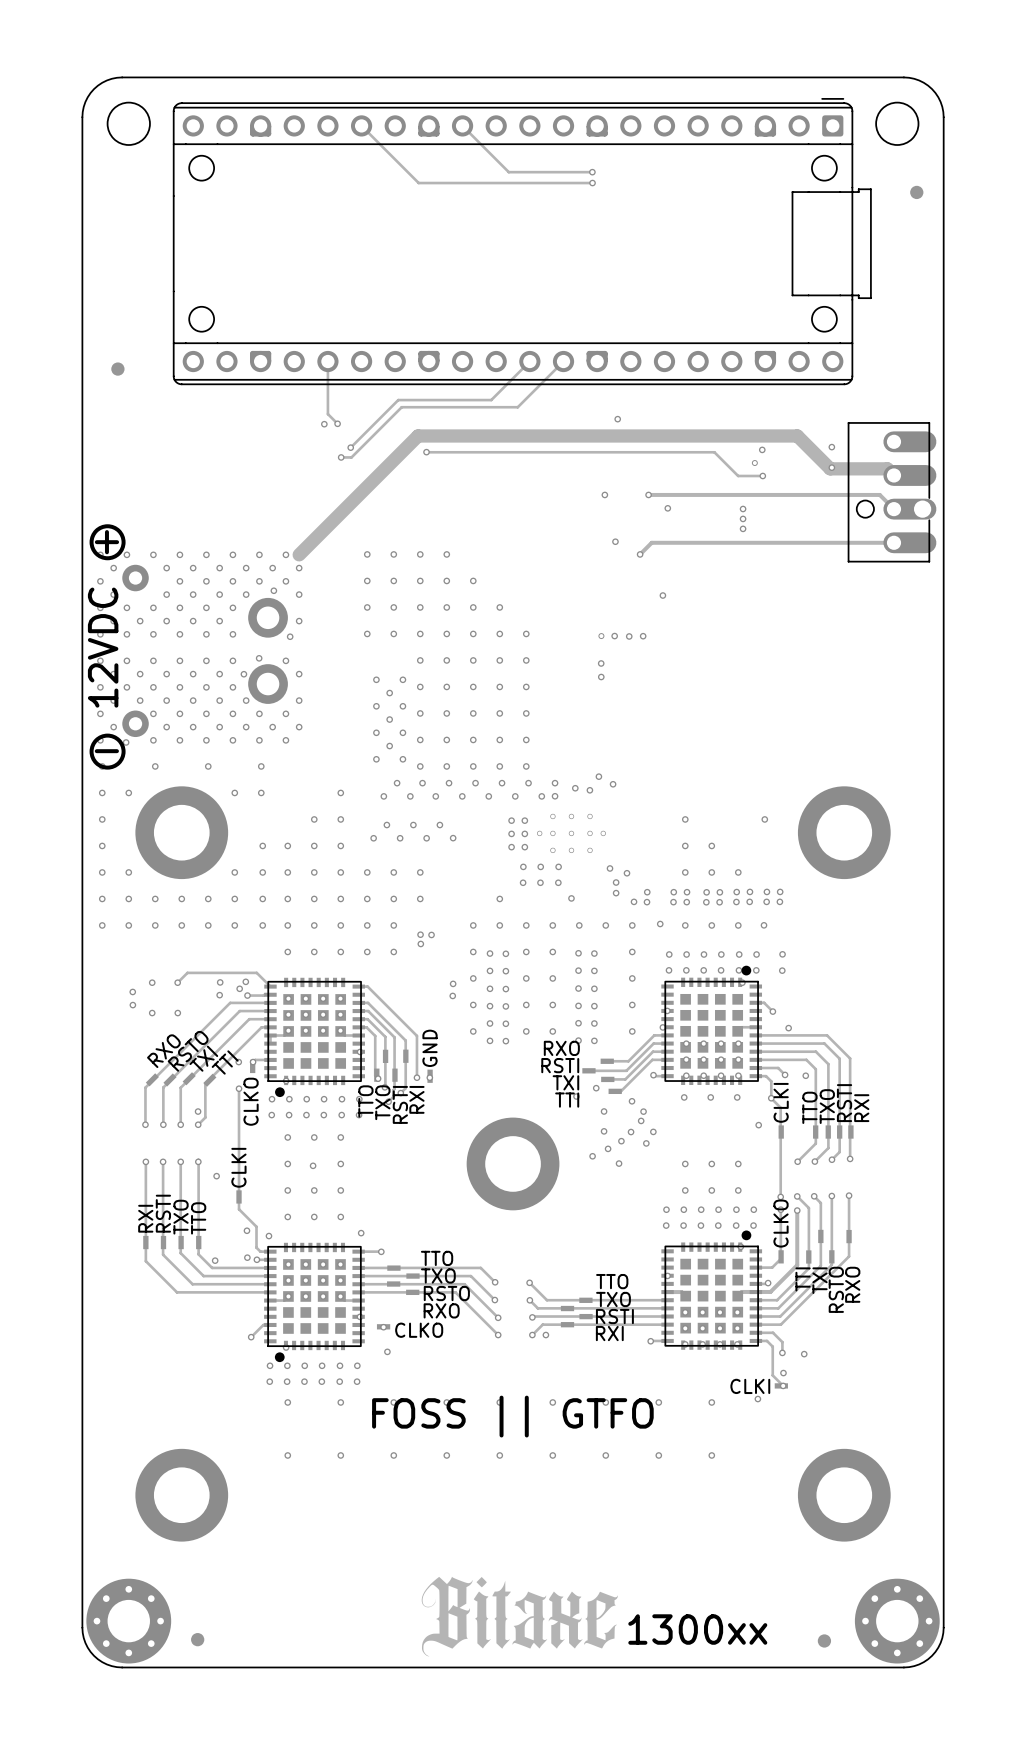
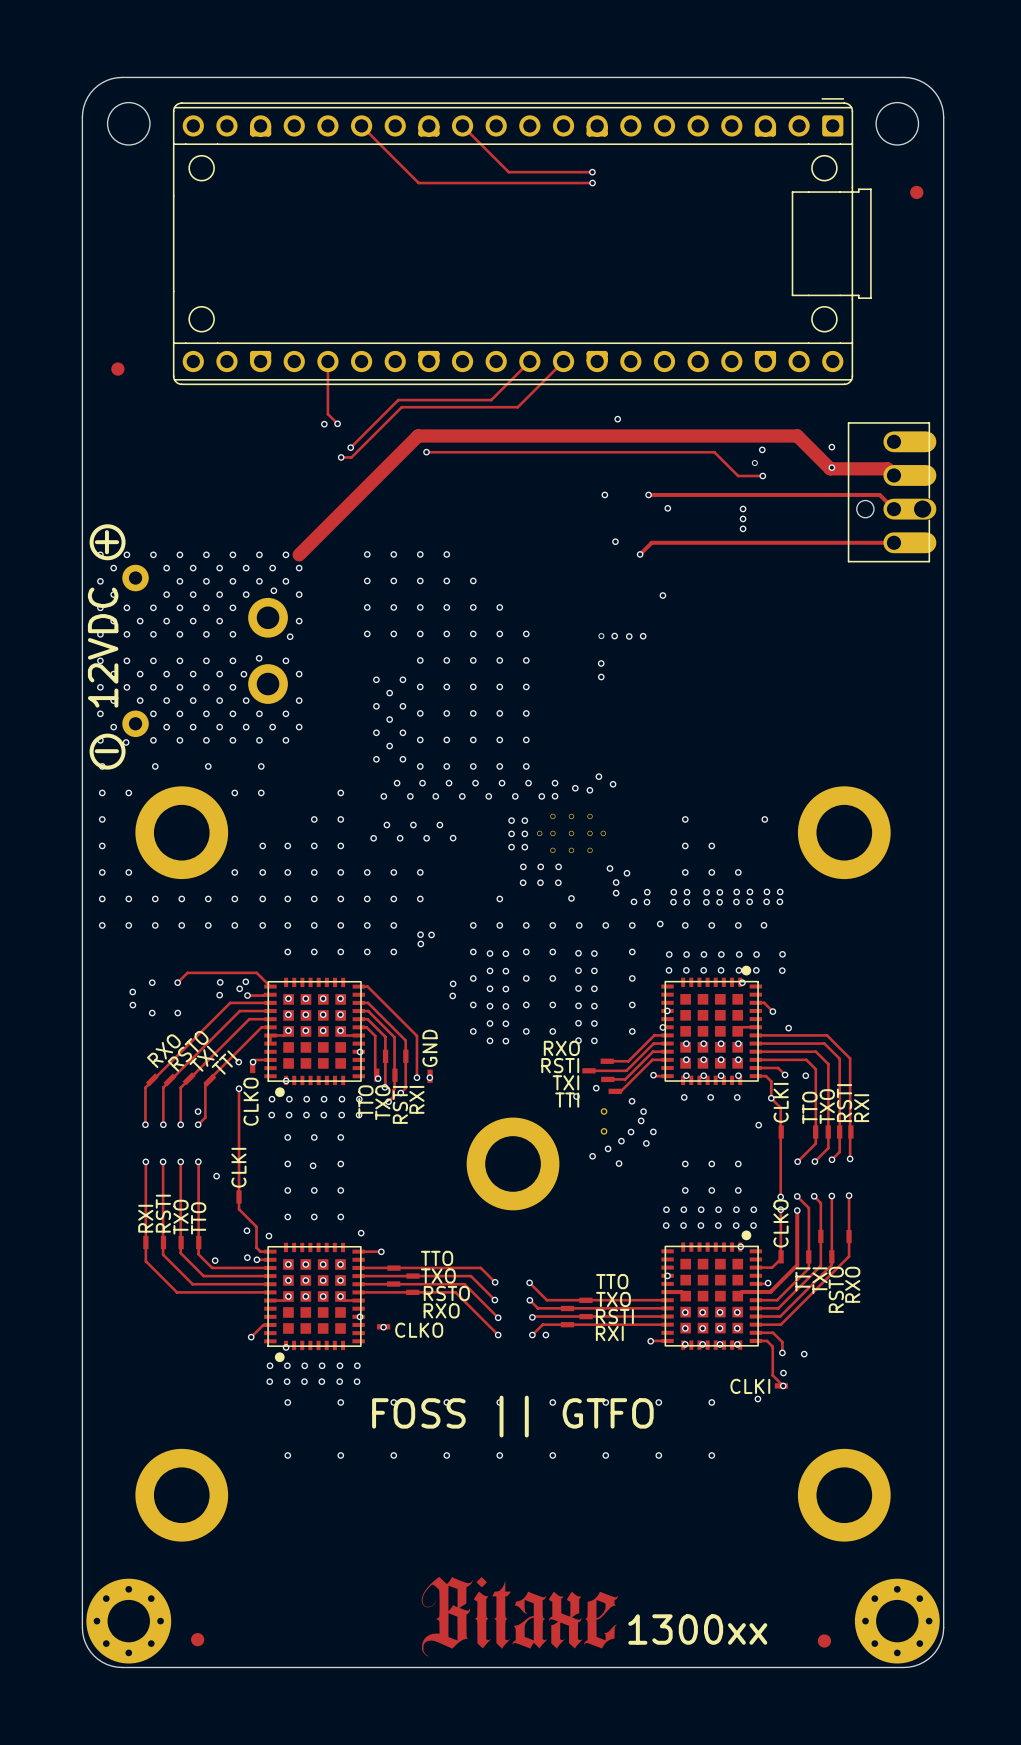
via: (387, 1351) -> none

